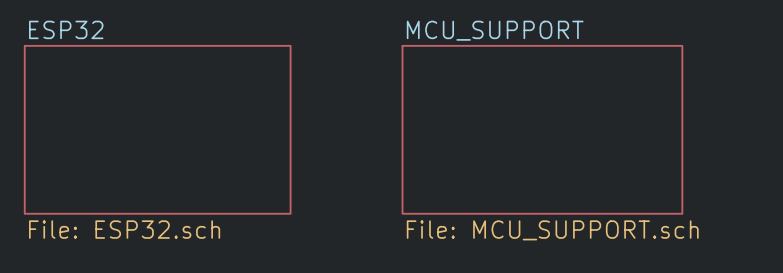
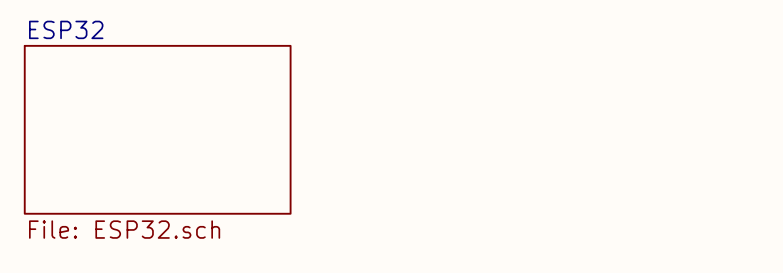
sheet MCU_SUPPORT: File: MCU_SUPPORT.sch (542, 129) -> none

